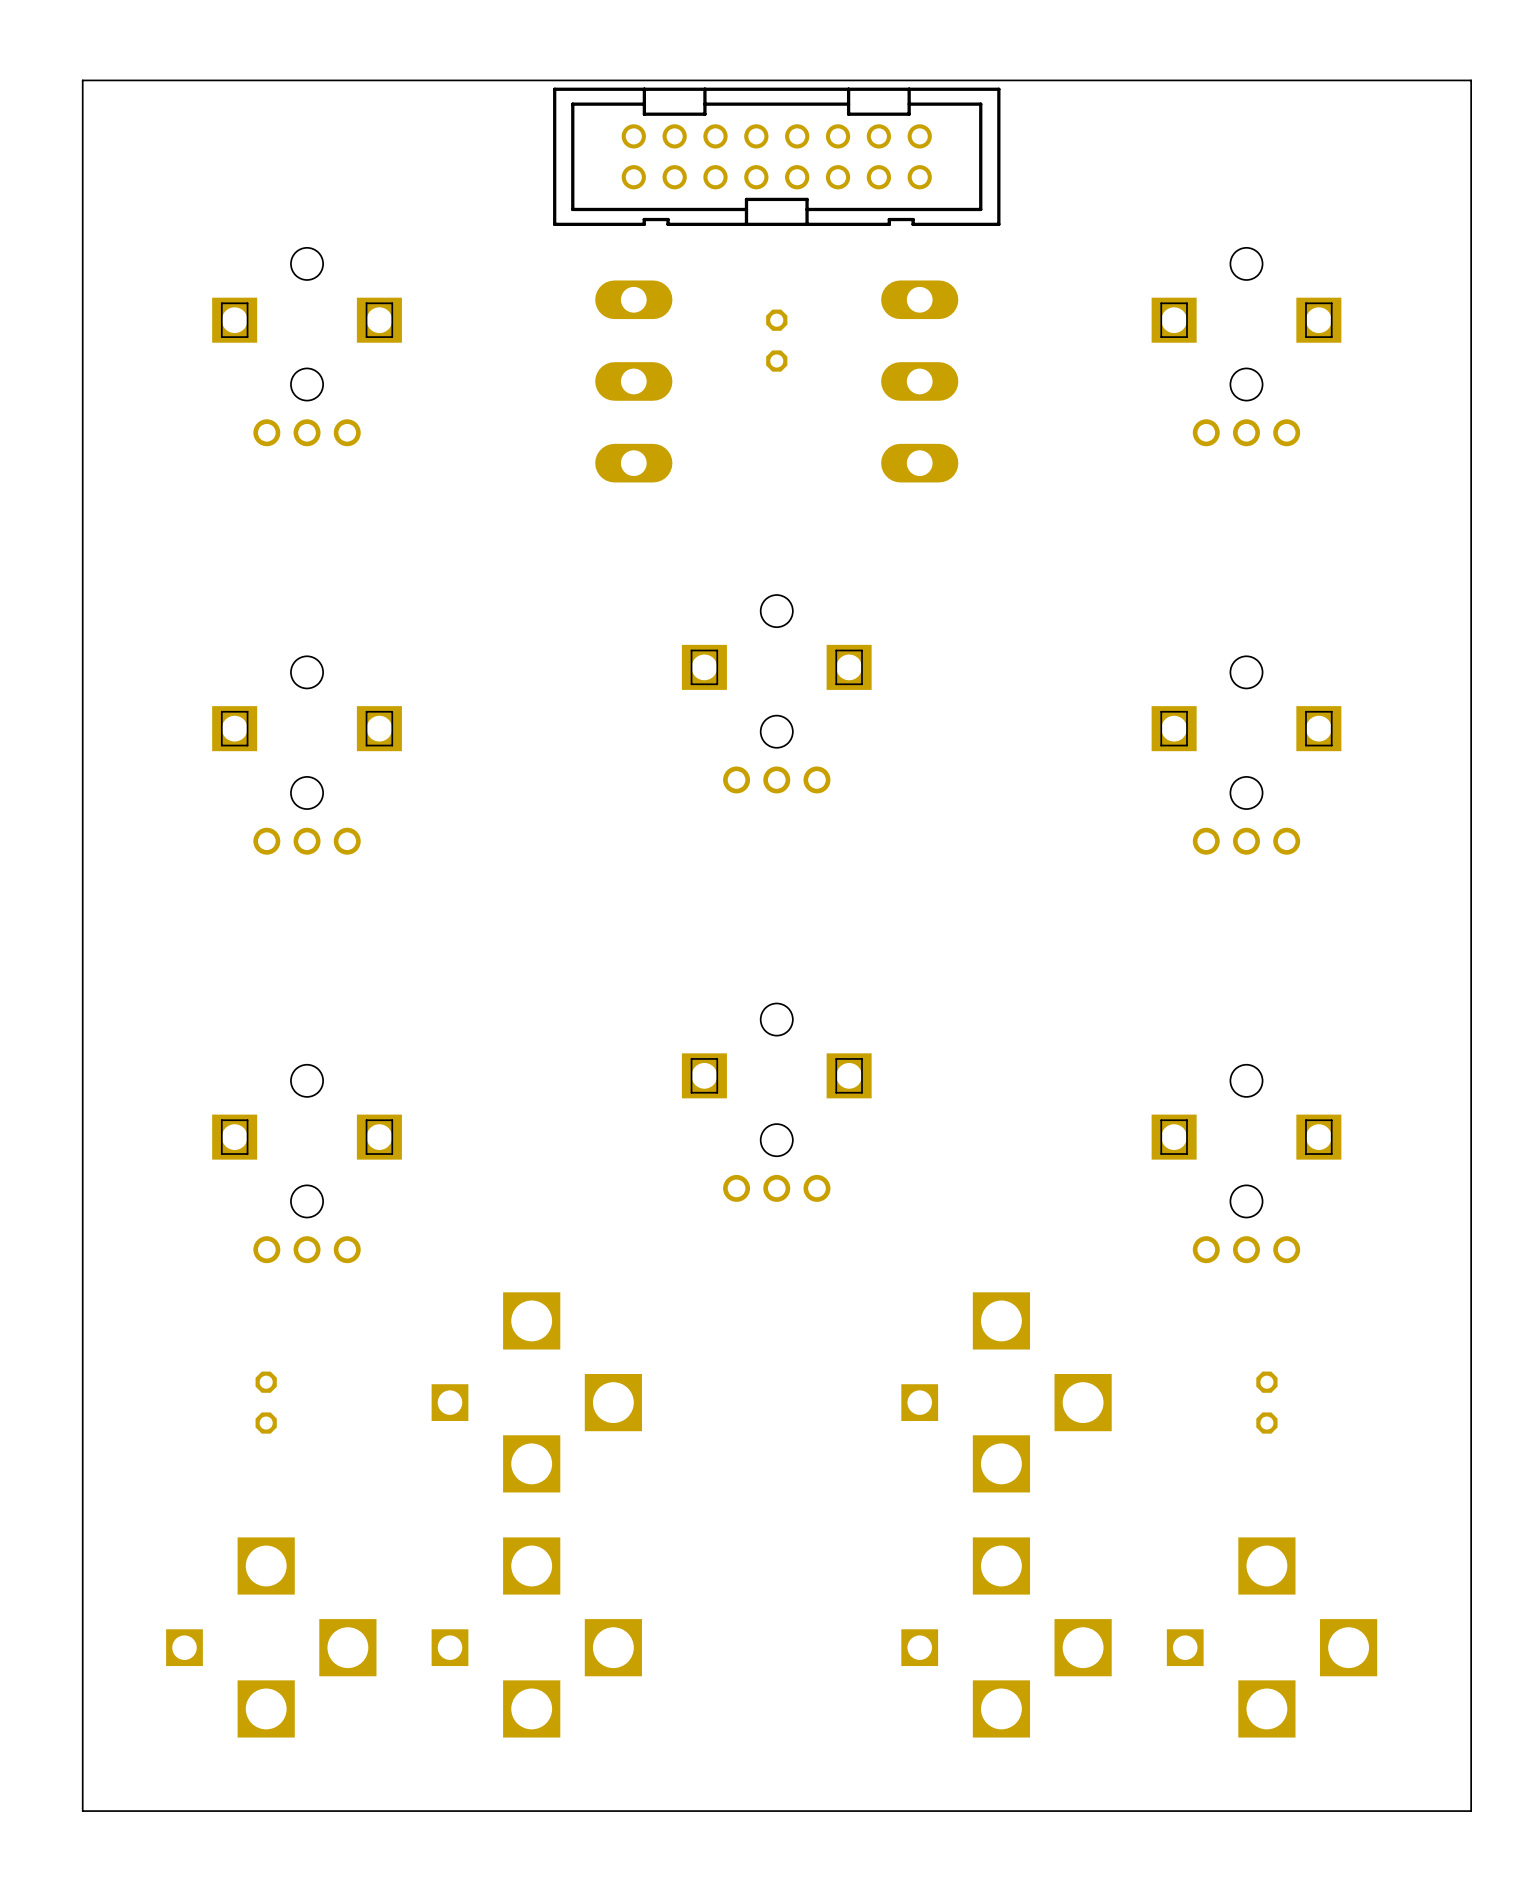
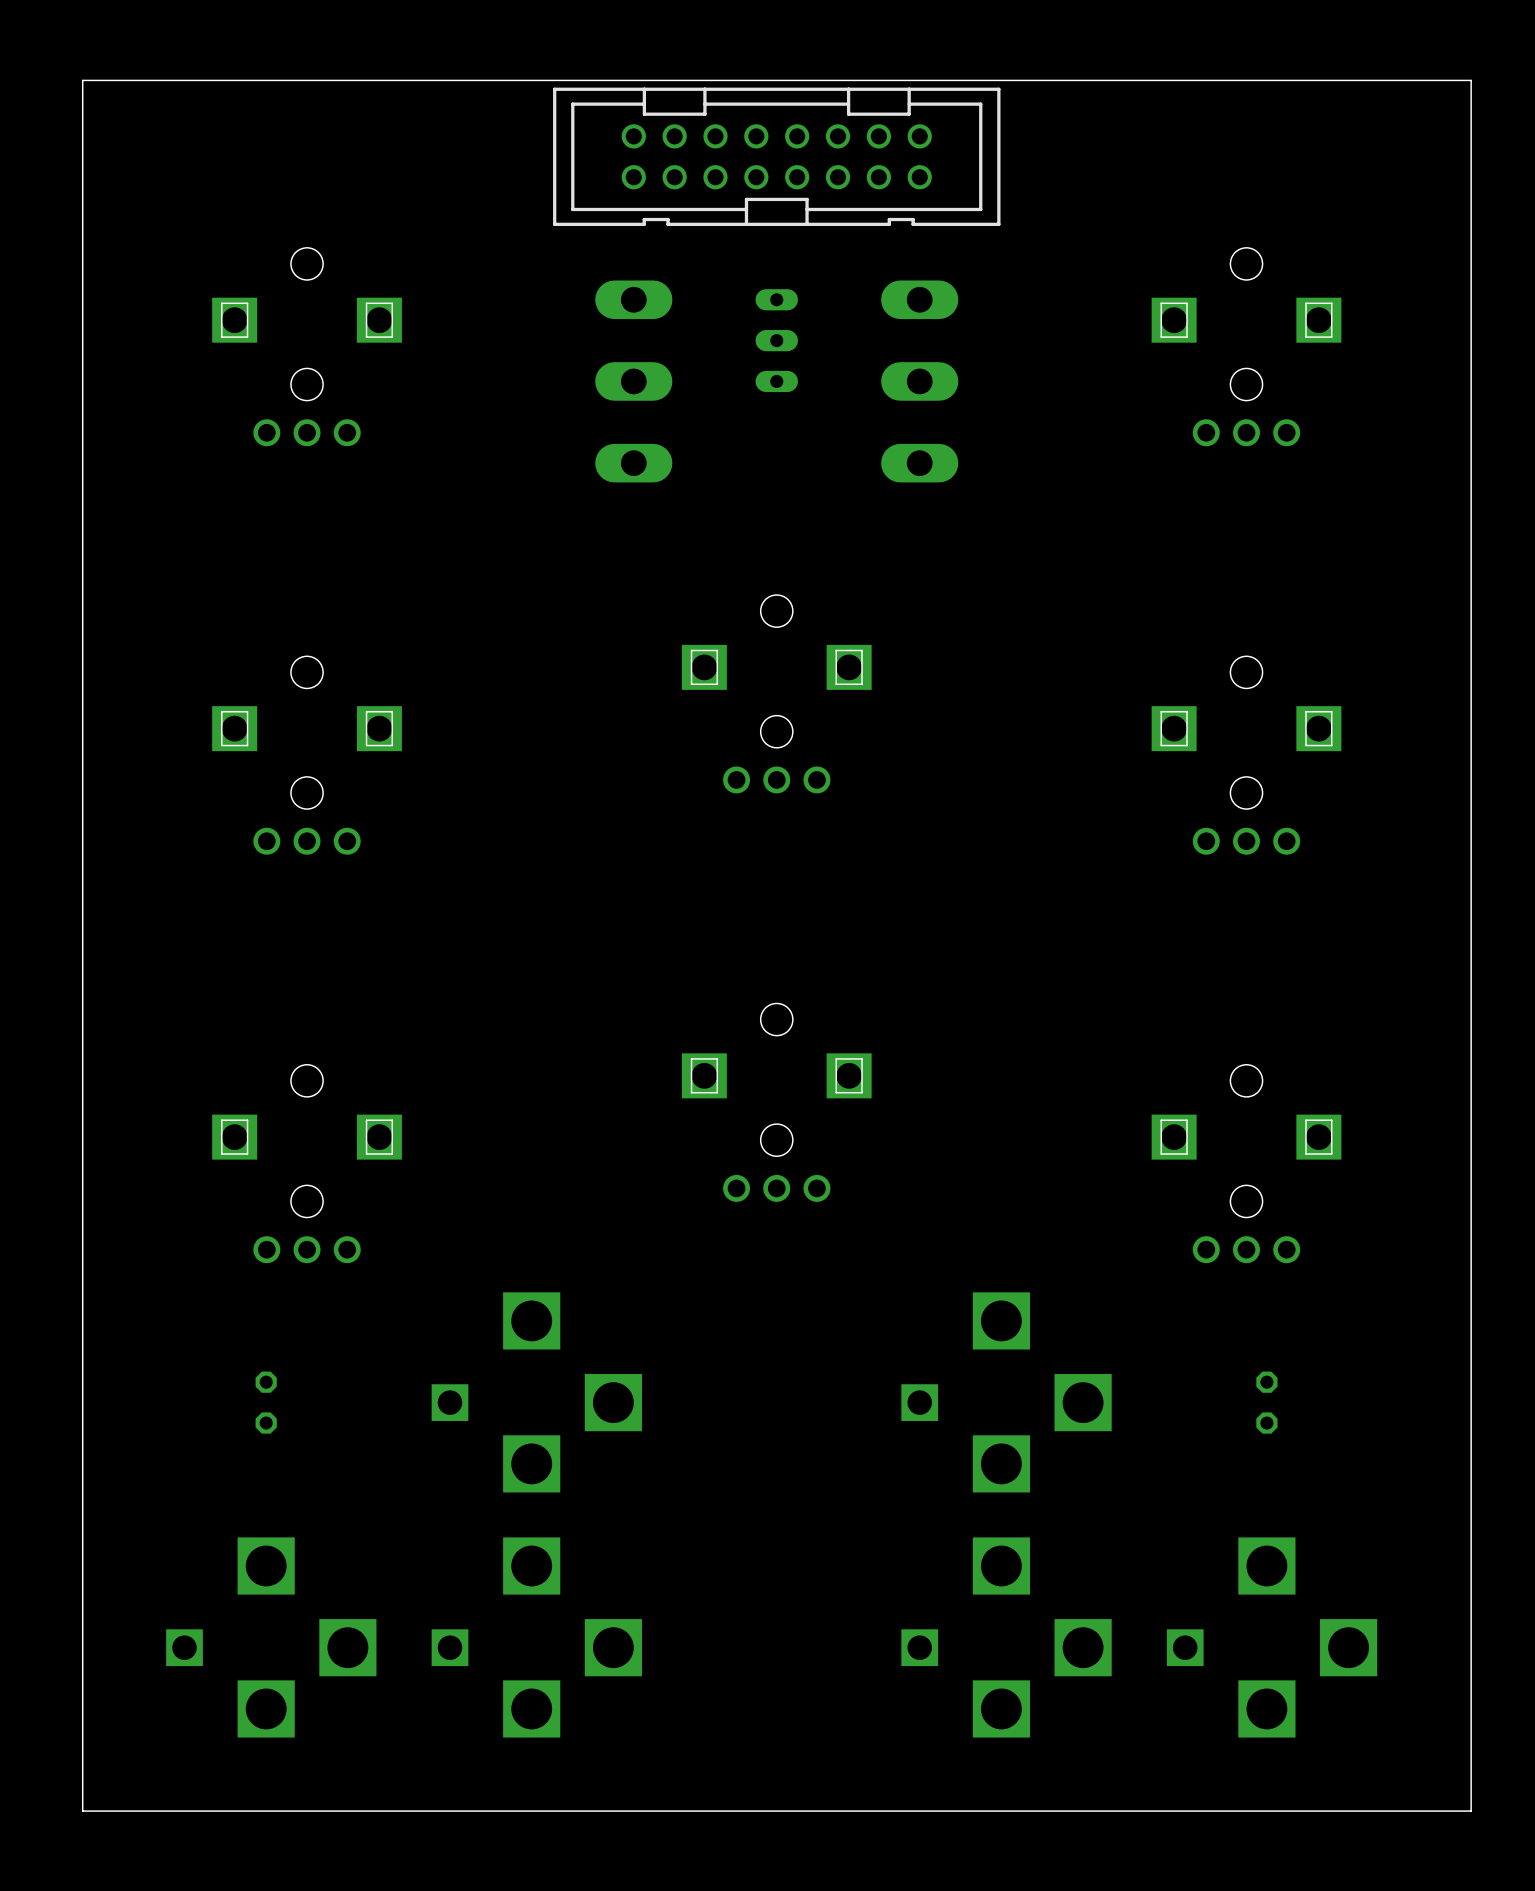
part footprint: [766, 309, 788, 372] -> [755, 289, 799, 393]

